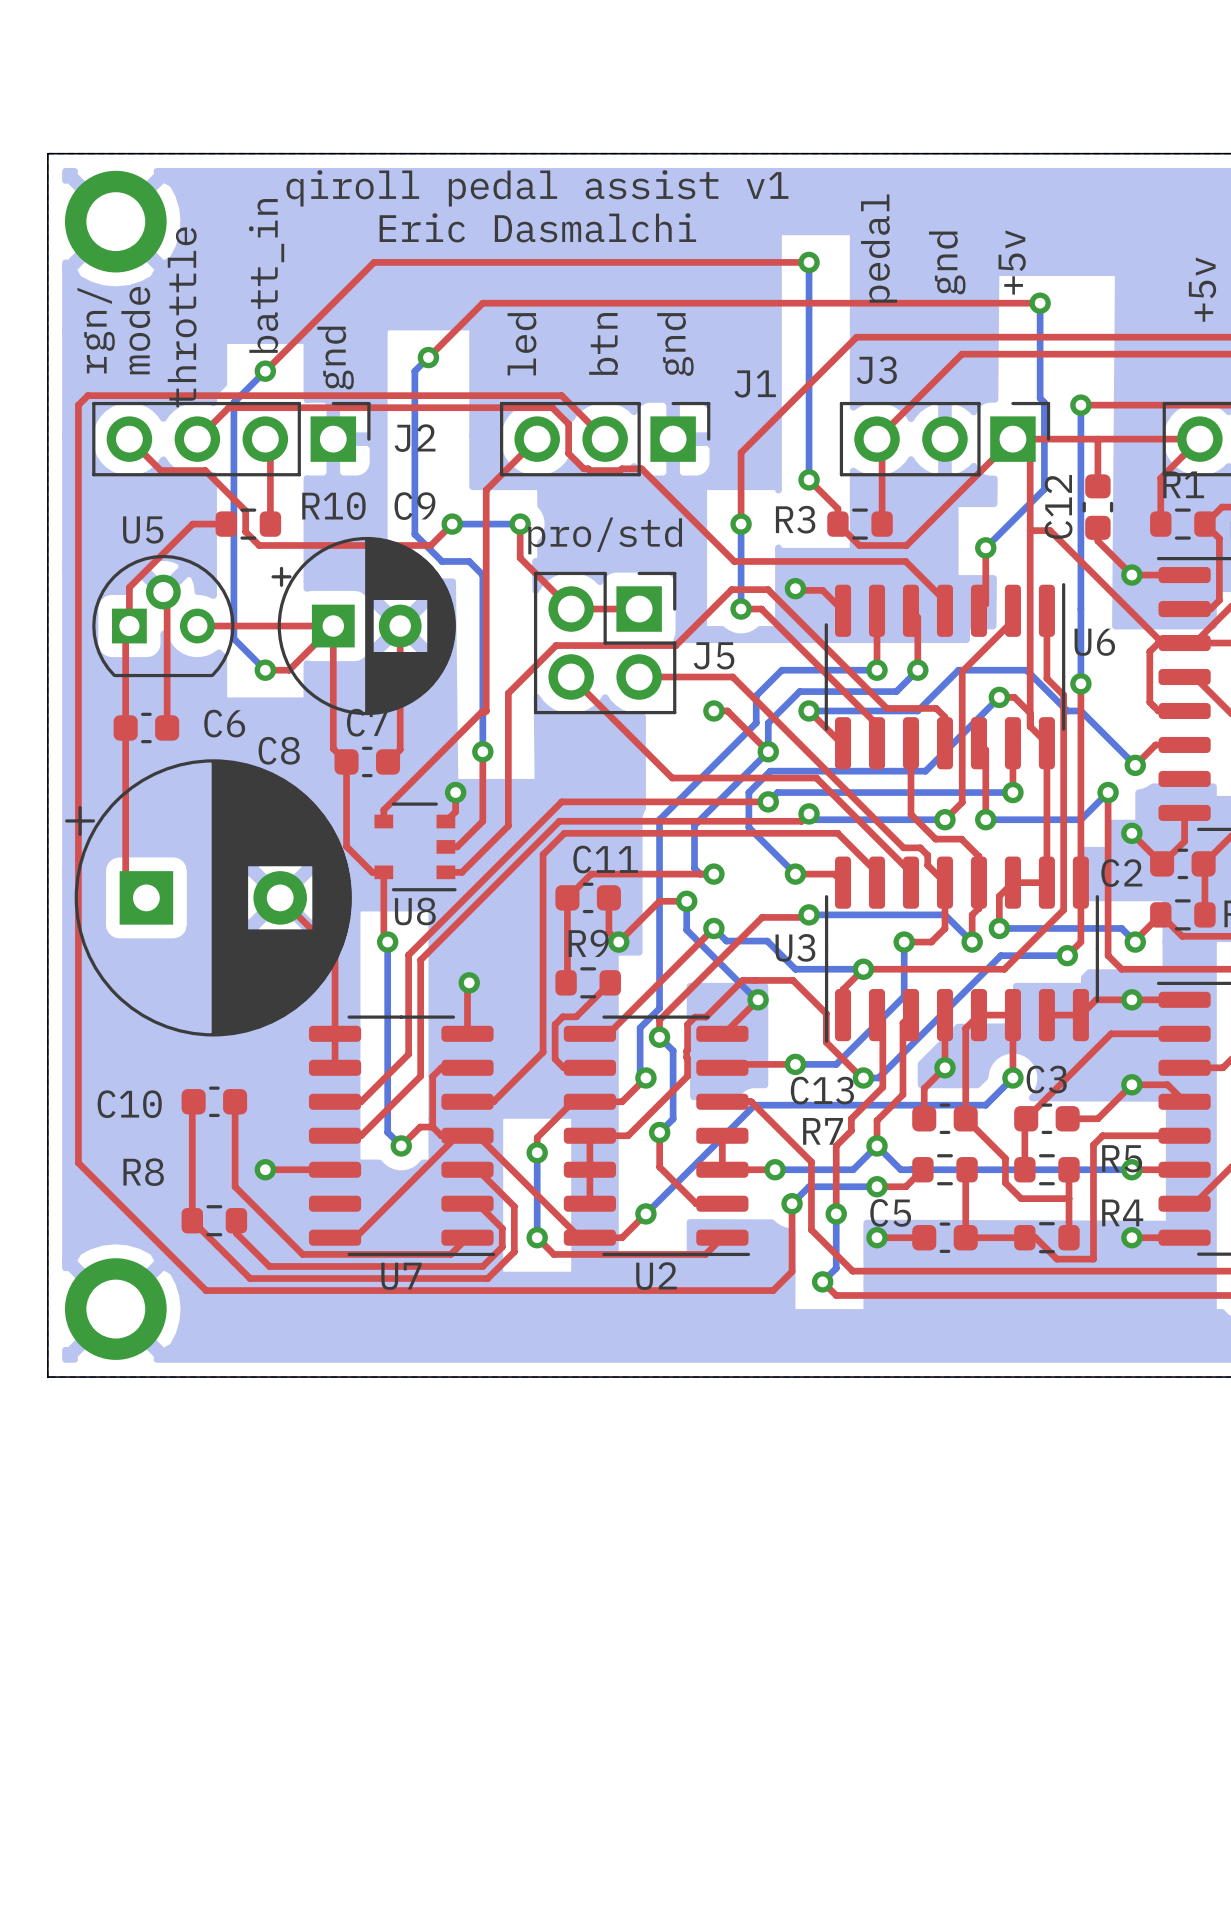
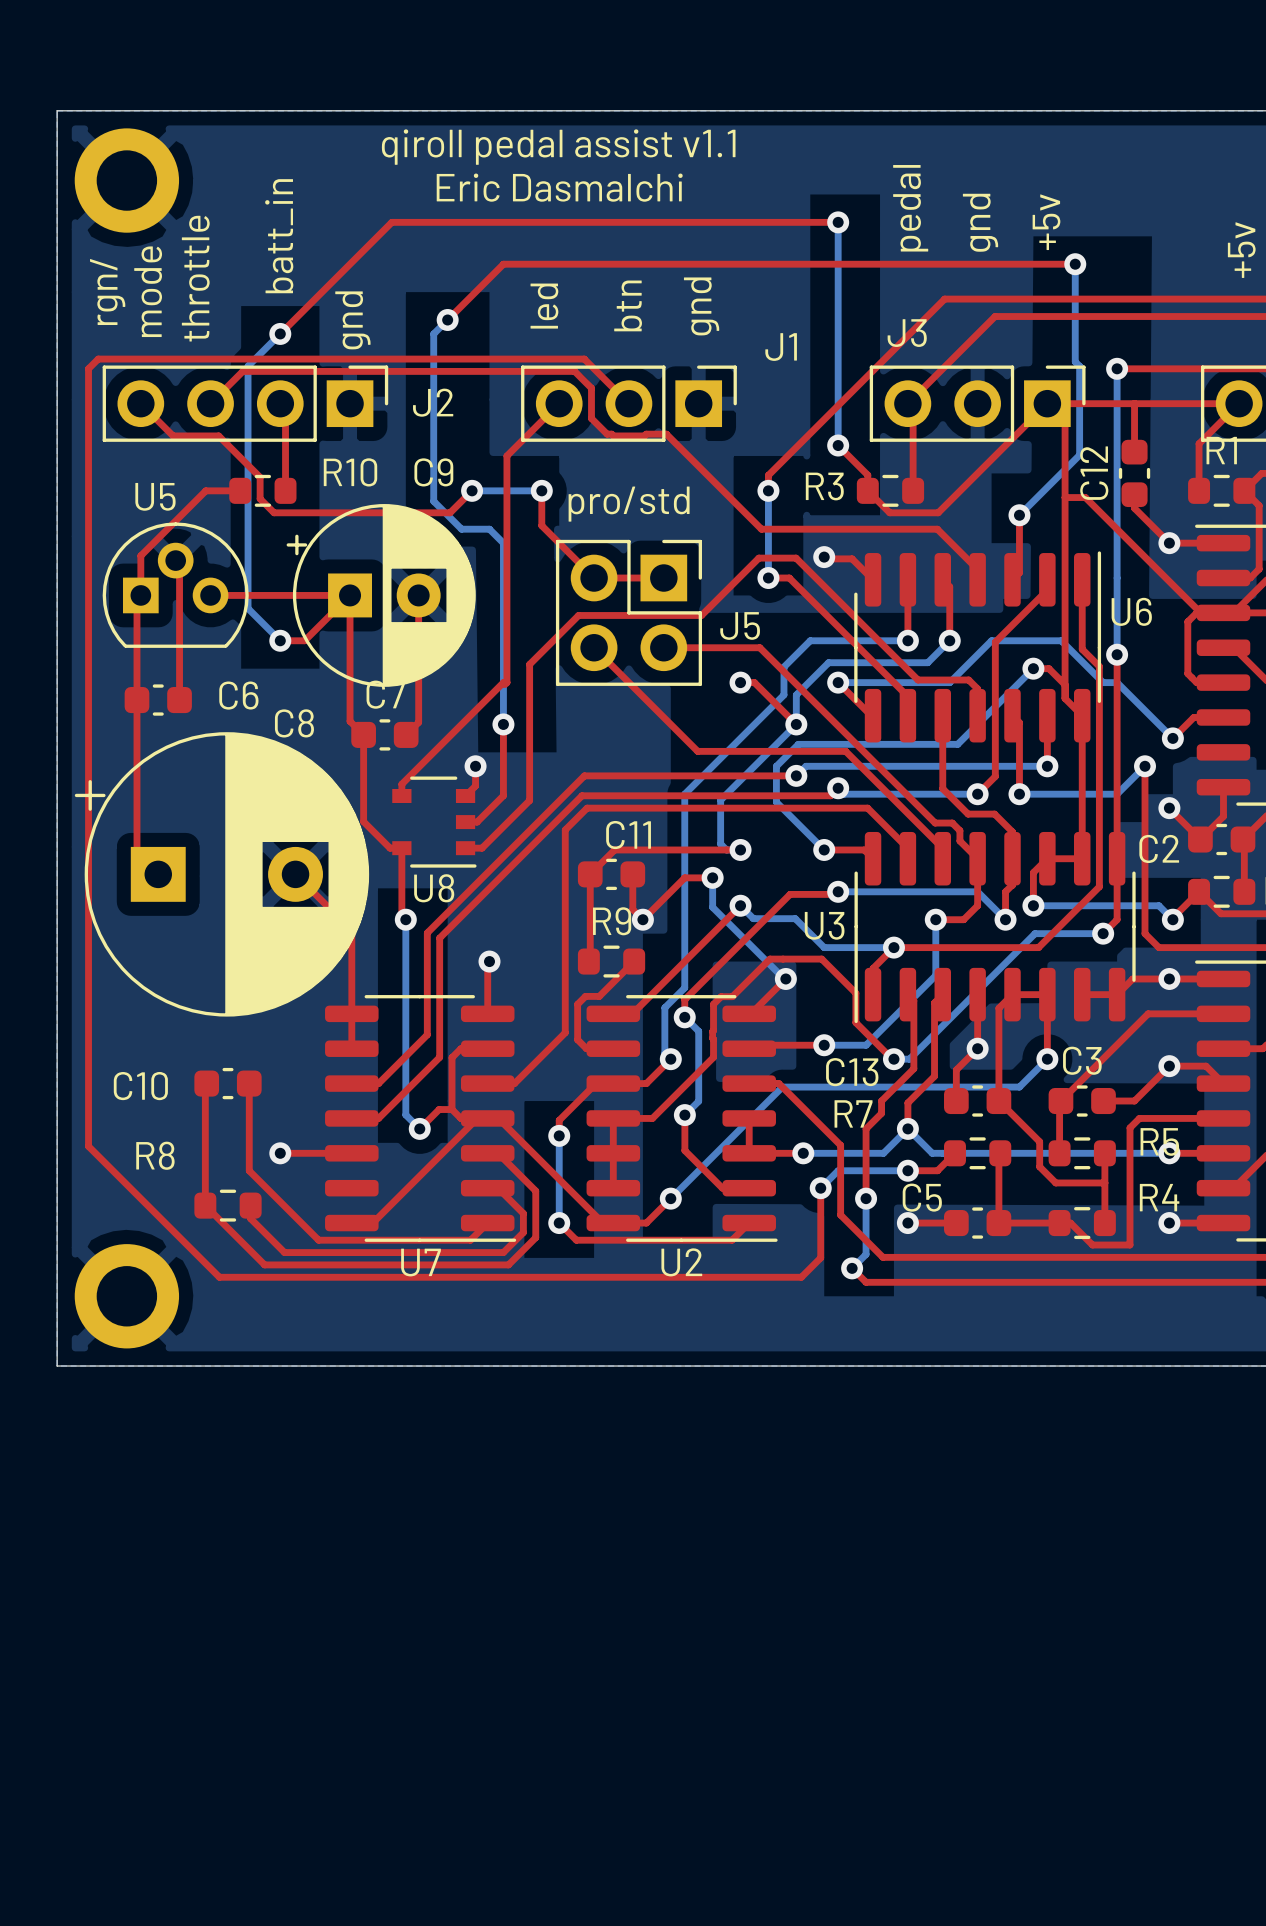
text: qiroll pedal assist v1 (537, 188) -> qiroll pedal assist v1.1 (558, 147)
top track: (912, 337) (856, 337) (741, 452) (741, 508) -> (944, 299) (768, 475)

